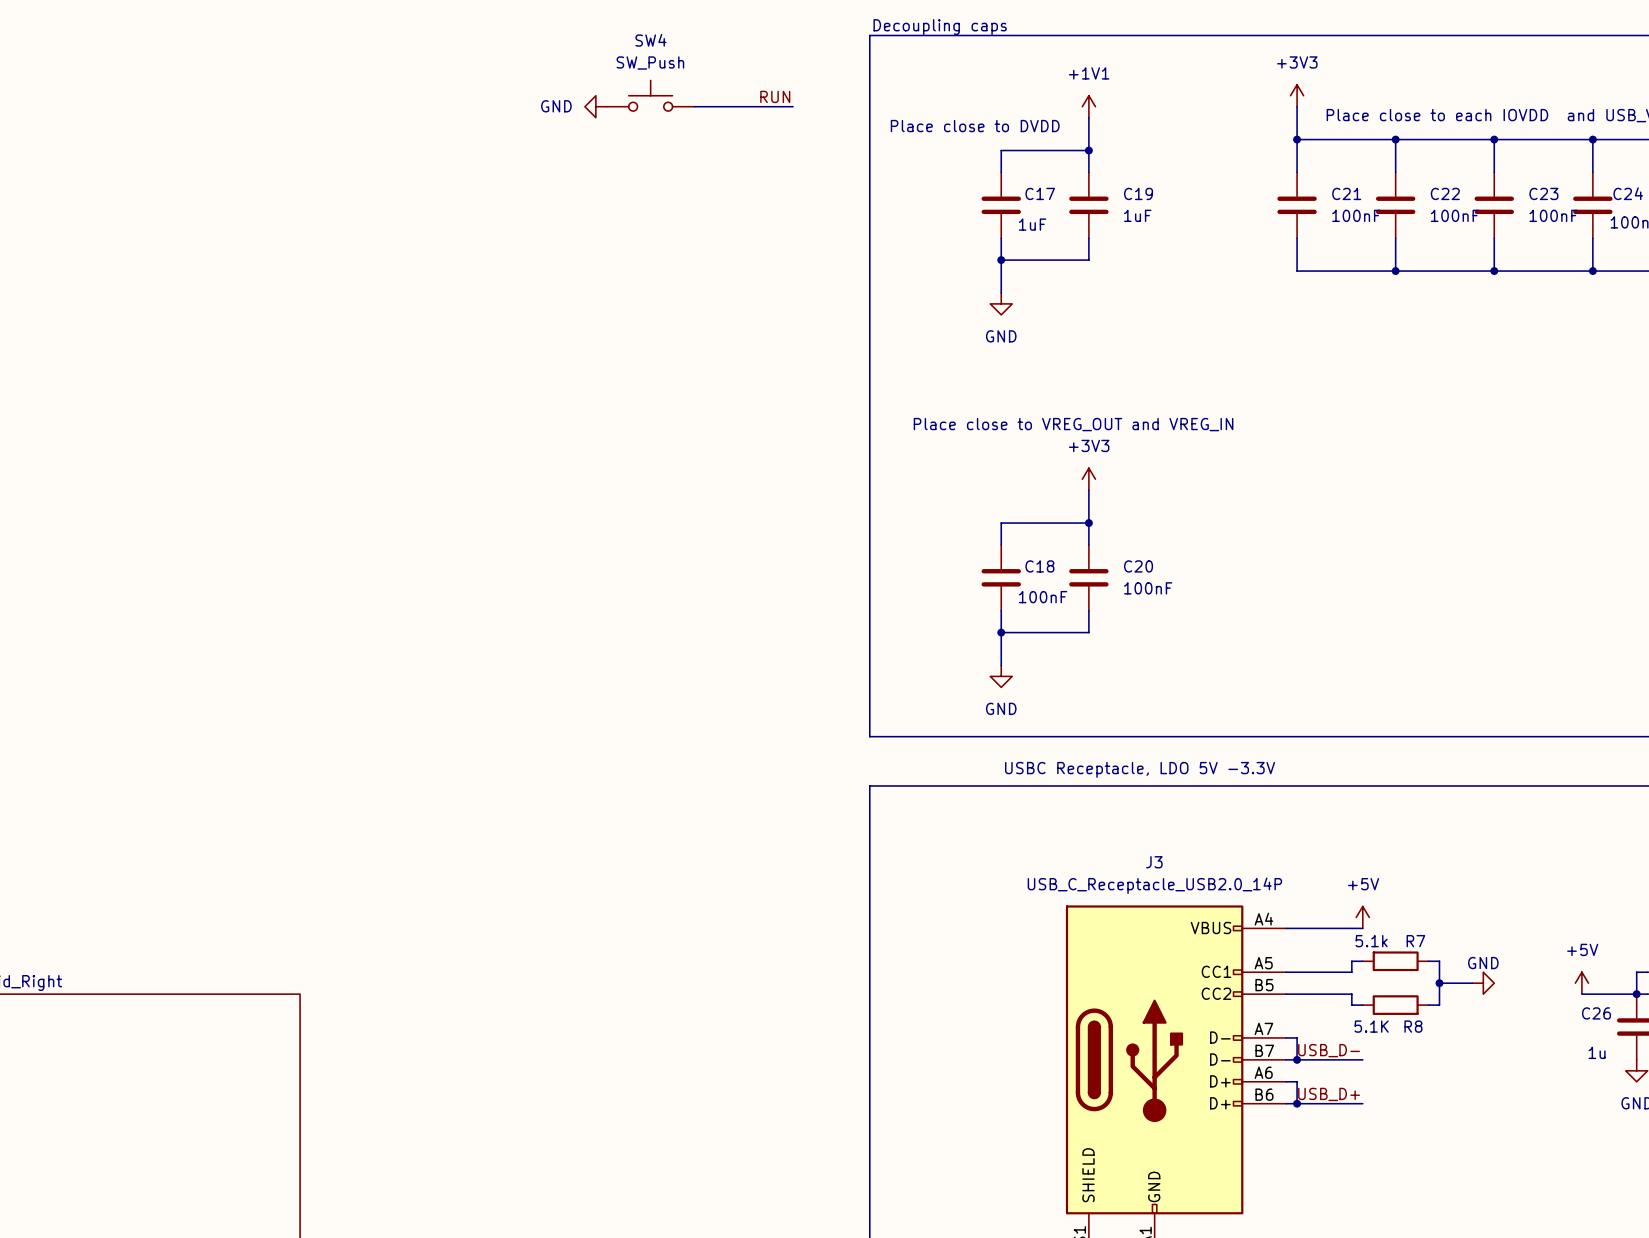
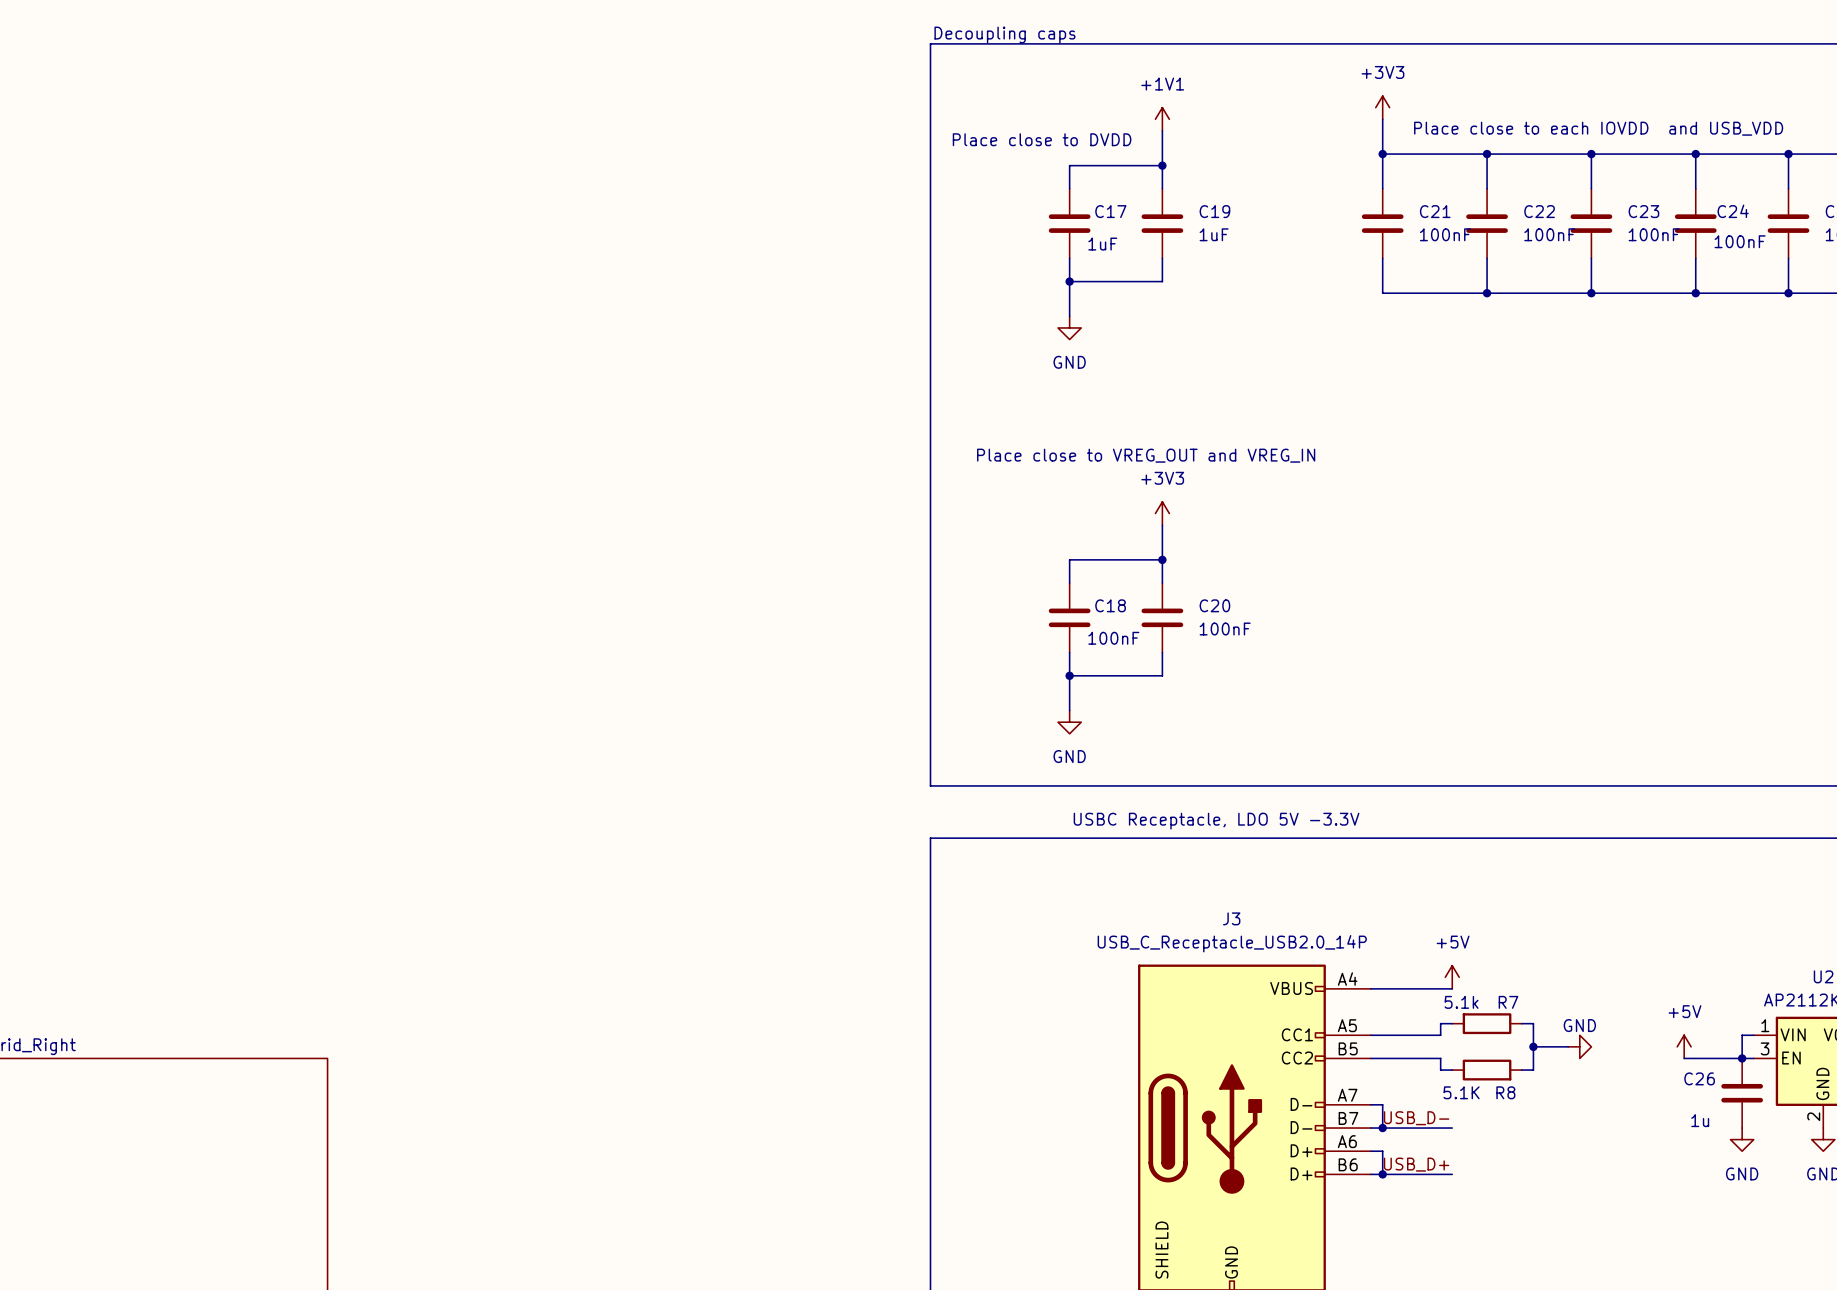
SW4: SW_Push (650, 95) -> none
label: RUN (775, 96) -> none
power symbol: GND (595, 106) -> none
wire: (694, 106) (793, 106) -> none

